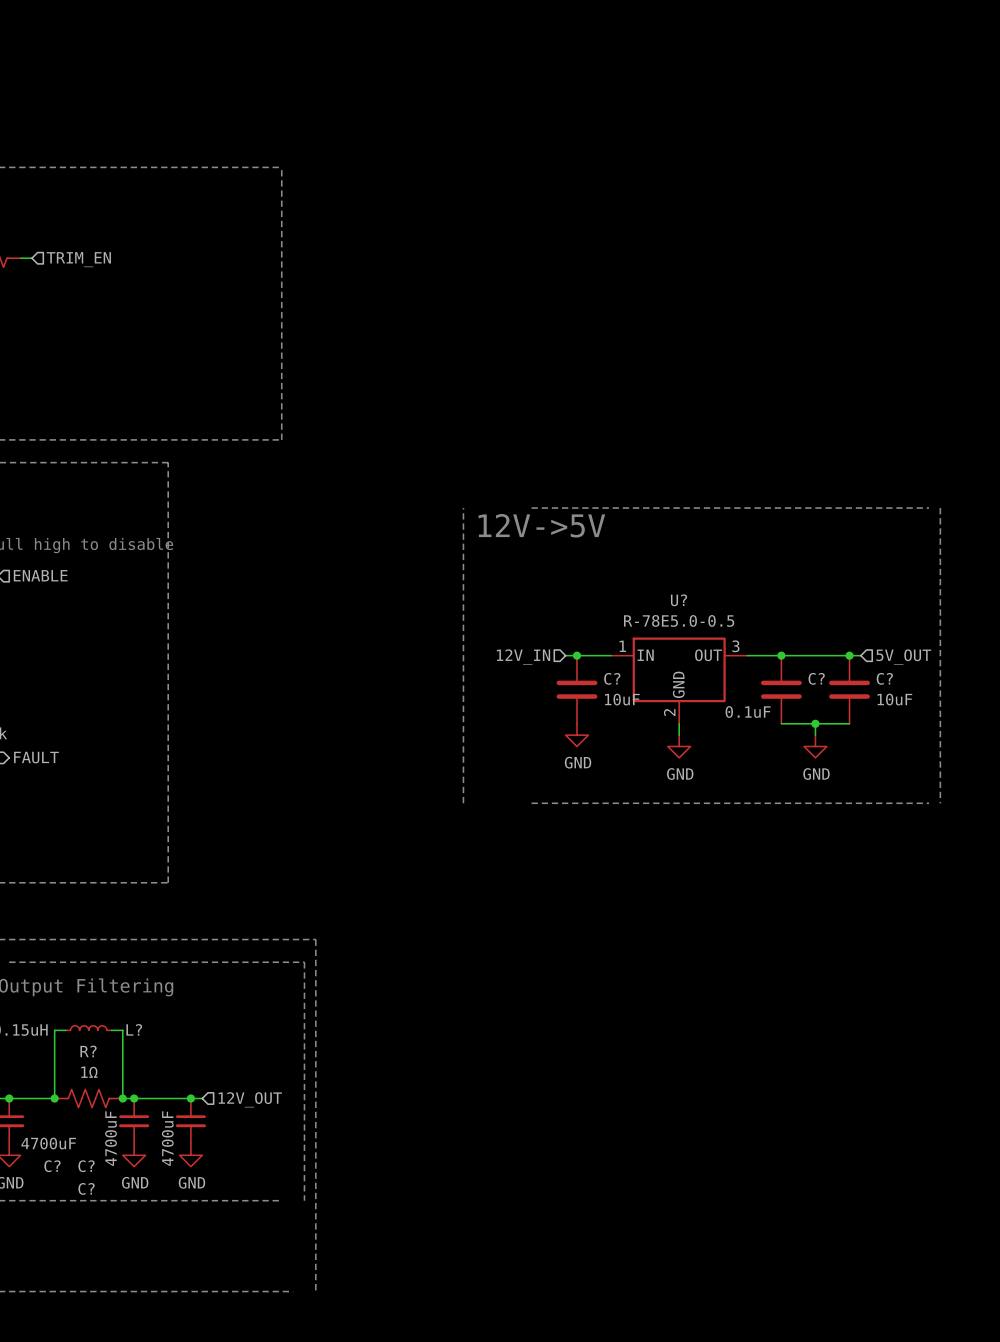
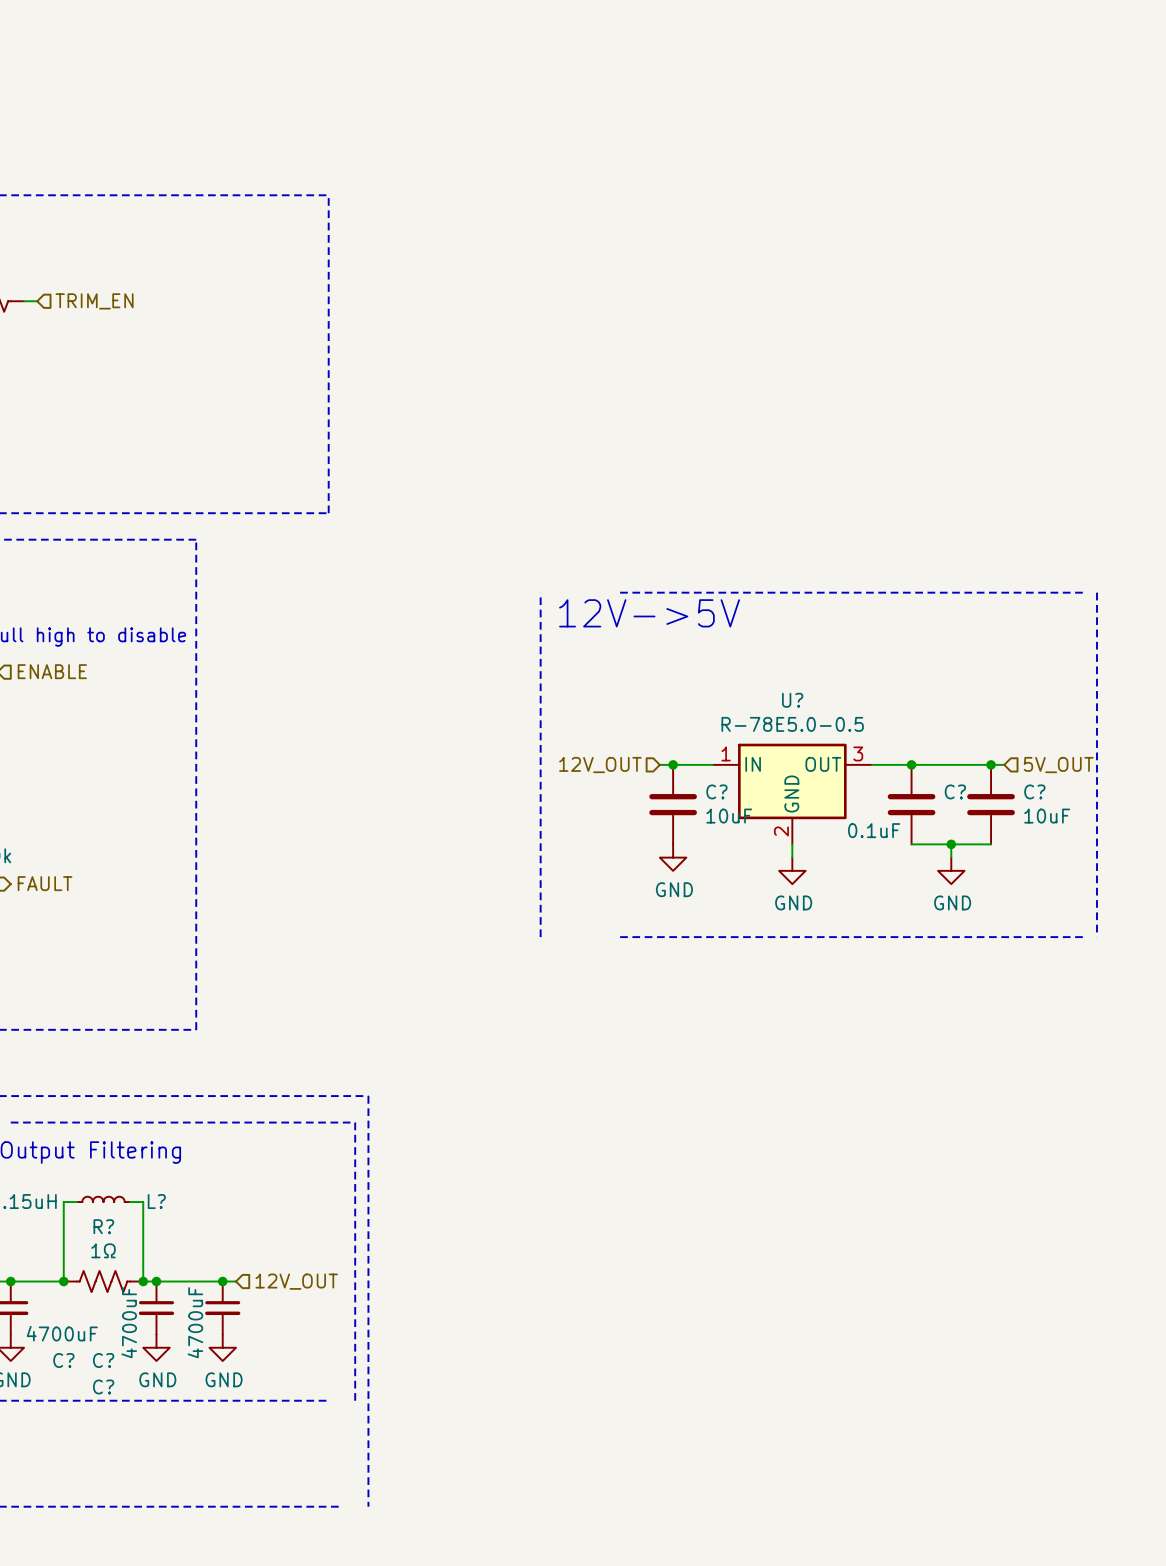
hierarchical label: 12V_IN (523, 656) -> 12V_OUT (600, 765)

